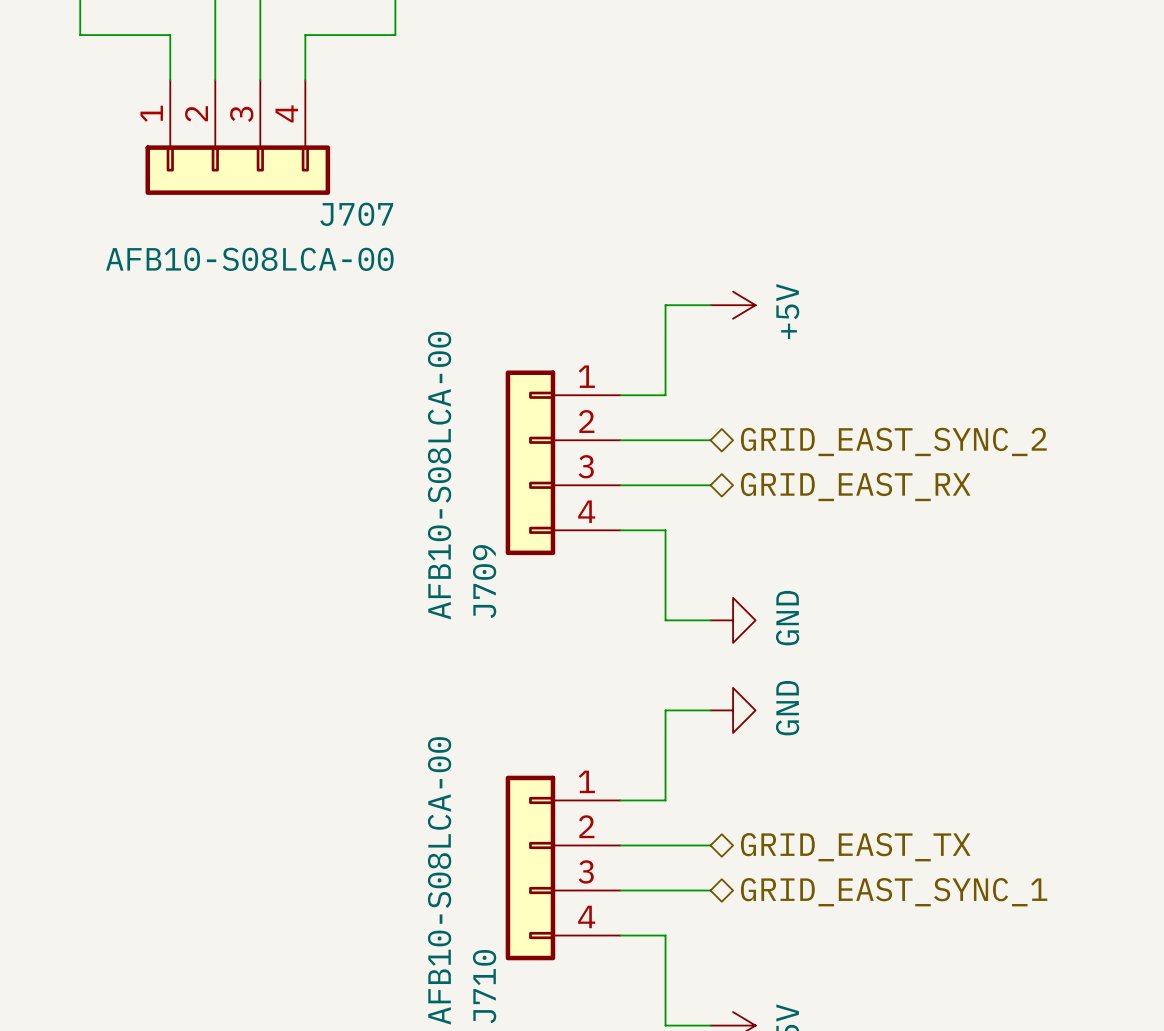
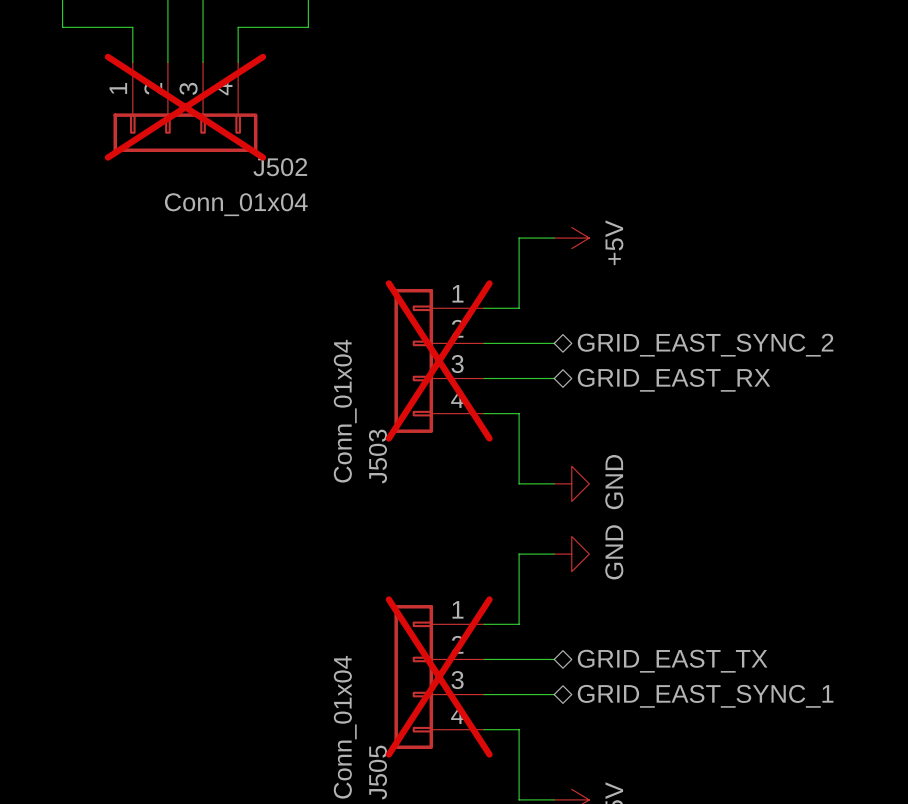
J707 do-not-place cross: none -> (185, 107)
J707 name: J707 (356, 214) -> J502 (280, 167)
J707 value: AFB10-S08LCA-00 (249, 259) -> Conn_01x04 (236, 204)
J709 do-not-place cross: none -> (439, 360)
J709 value: AFB10-S08LCA-00 (439, 475) -> Conn_01x04 (345, 411)
J709 name: J709 (484, 581) -> J503 (377, 456)
J710 do-not-place cross: none -> (439, 677)
J710 value: AFB10-S08LCA-00 (439, 880) -> Conn_01x04 (345, 727)
J710 name: J710 (484, 986) -> J505 (377, 772)

